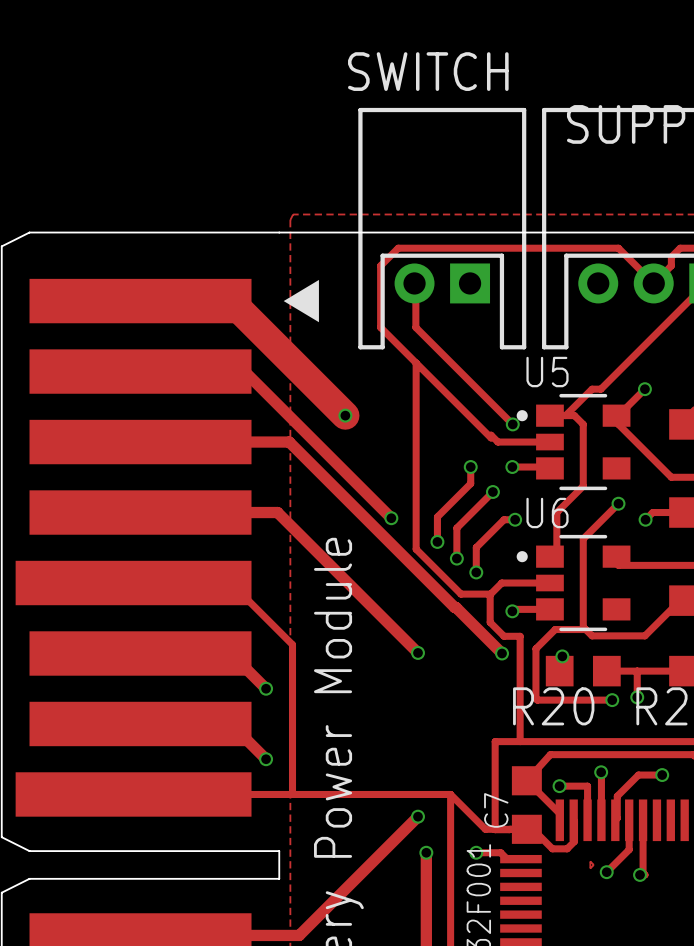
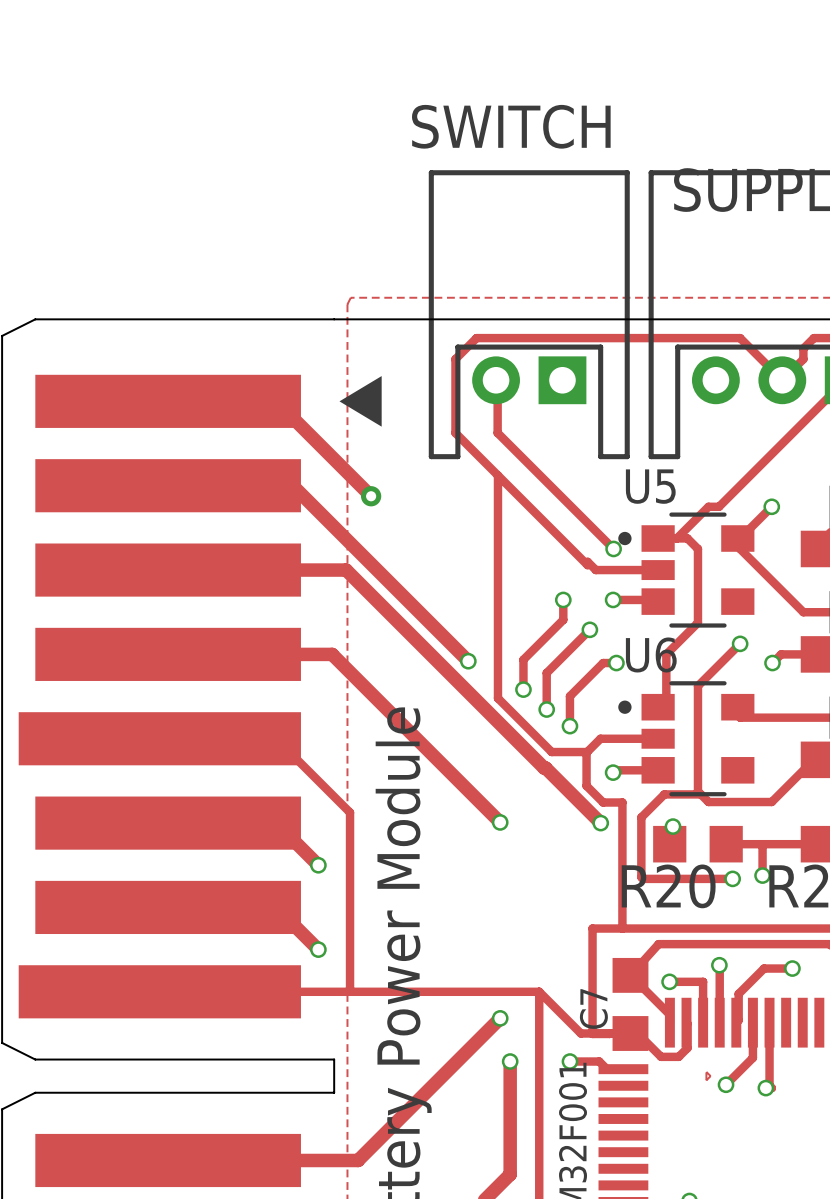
track width: thick (230, 301) (310, 380) -> thin (276, 401) (371, 496)
track: (310, 380) (345, 415) -> none
via: none -> (371, 496)
via: (345, 415) -> none

